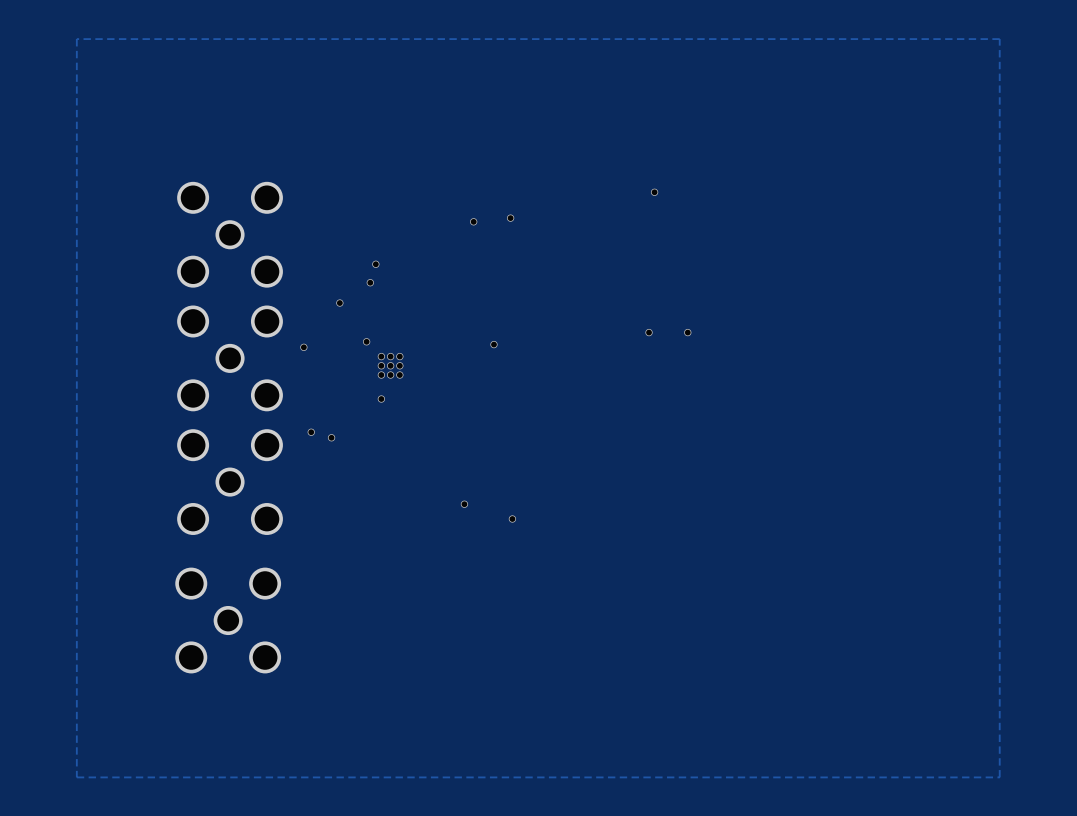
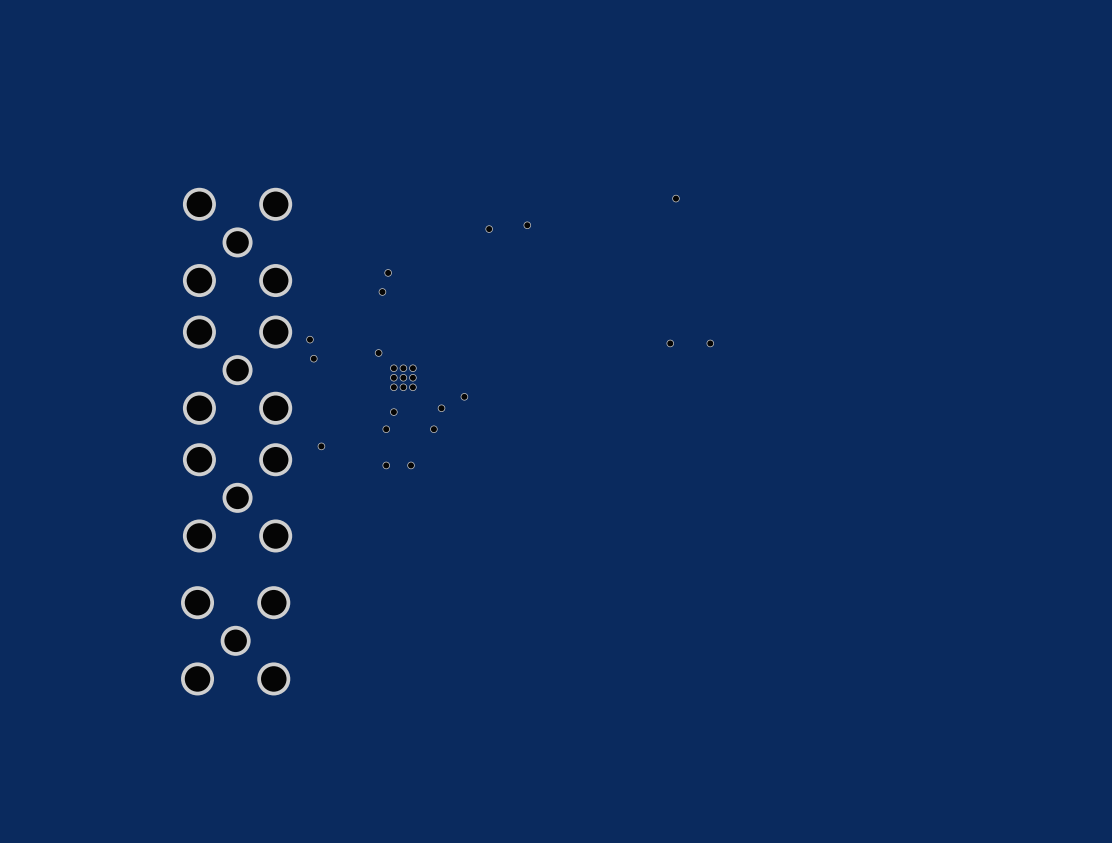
zone outline: (999, 39) (999, 777) (76, 777) (76, 39) (999, 39) -> none
via position: (339, 303) -> (309, 339)
via: (493, 344) -> none
via: none -> (464, 396)
via: none -> (441, 408)
via: none -> (386, 429)
via: none -> (433, 429)
via: (331, 437) -> none
via: none -> (386, 465)
via: none -> (411, 465)
via: (464, 504) -> none
via: (512, 518) -> none

